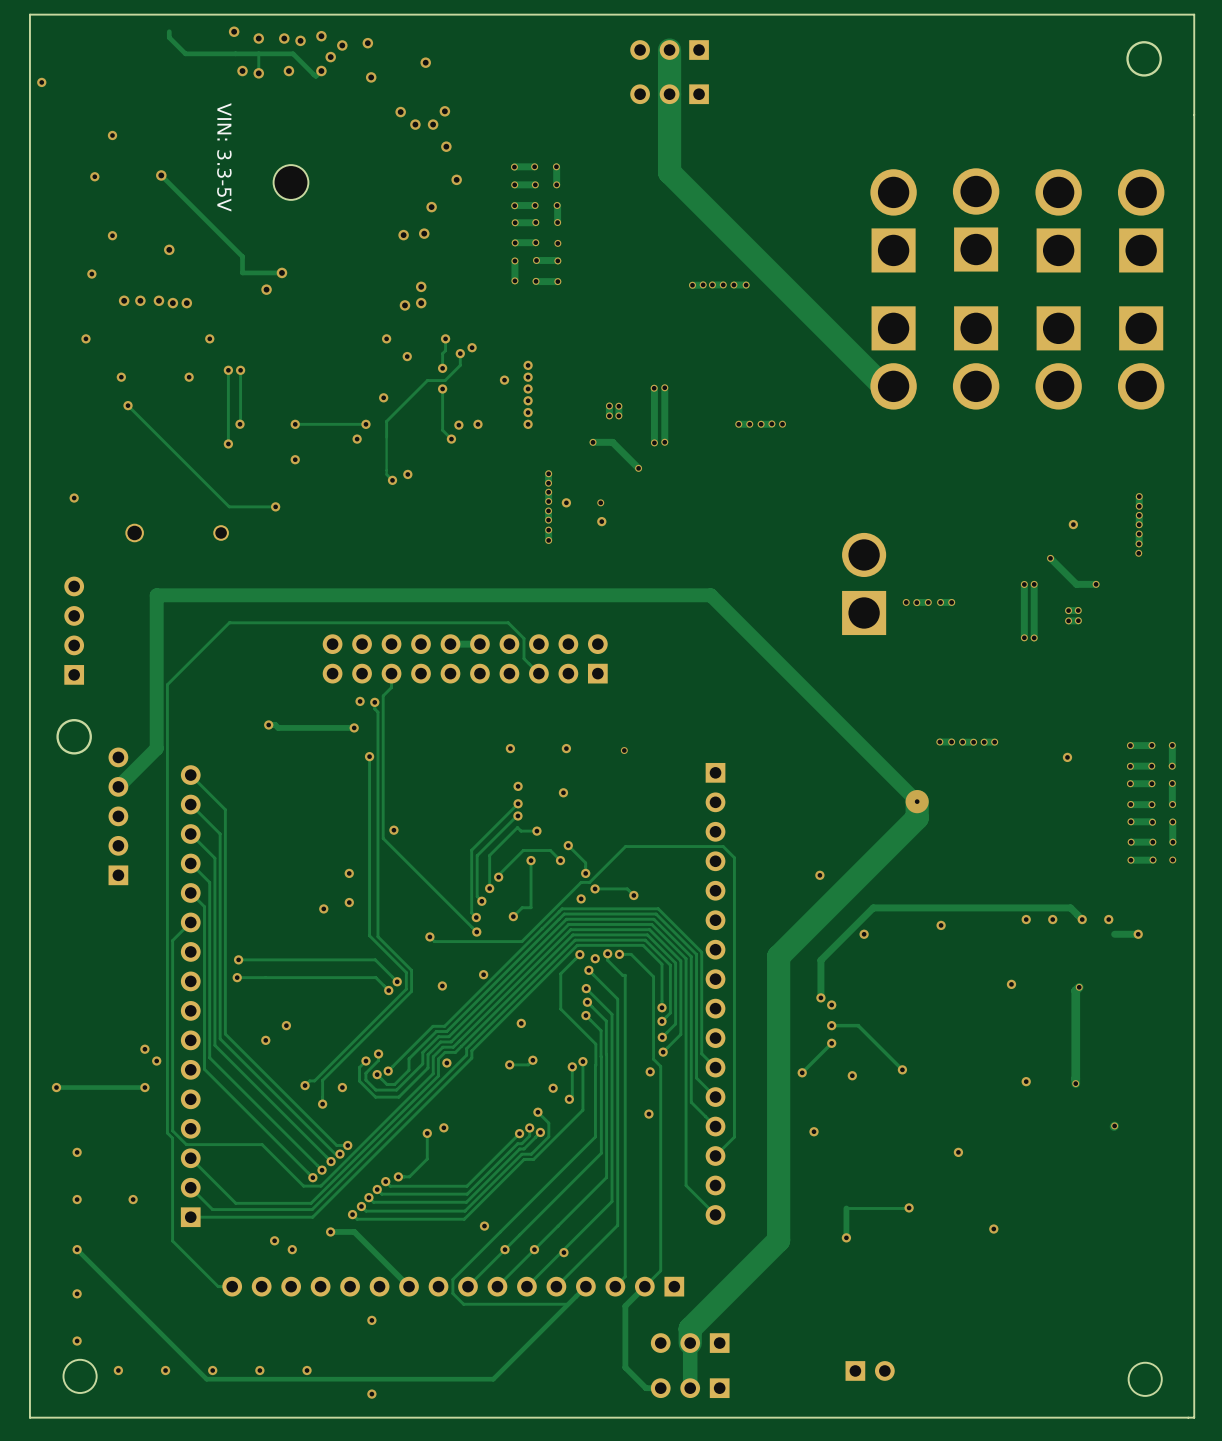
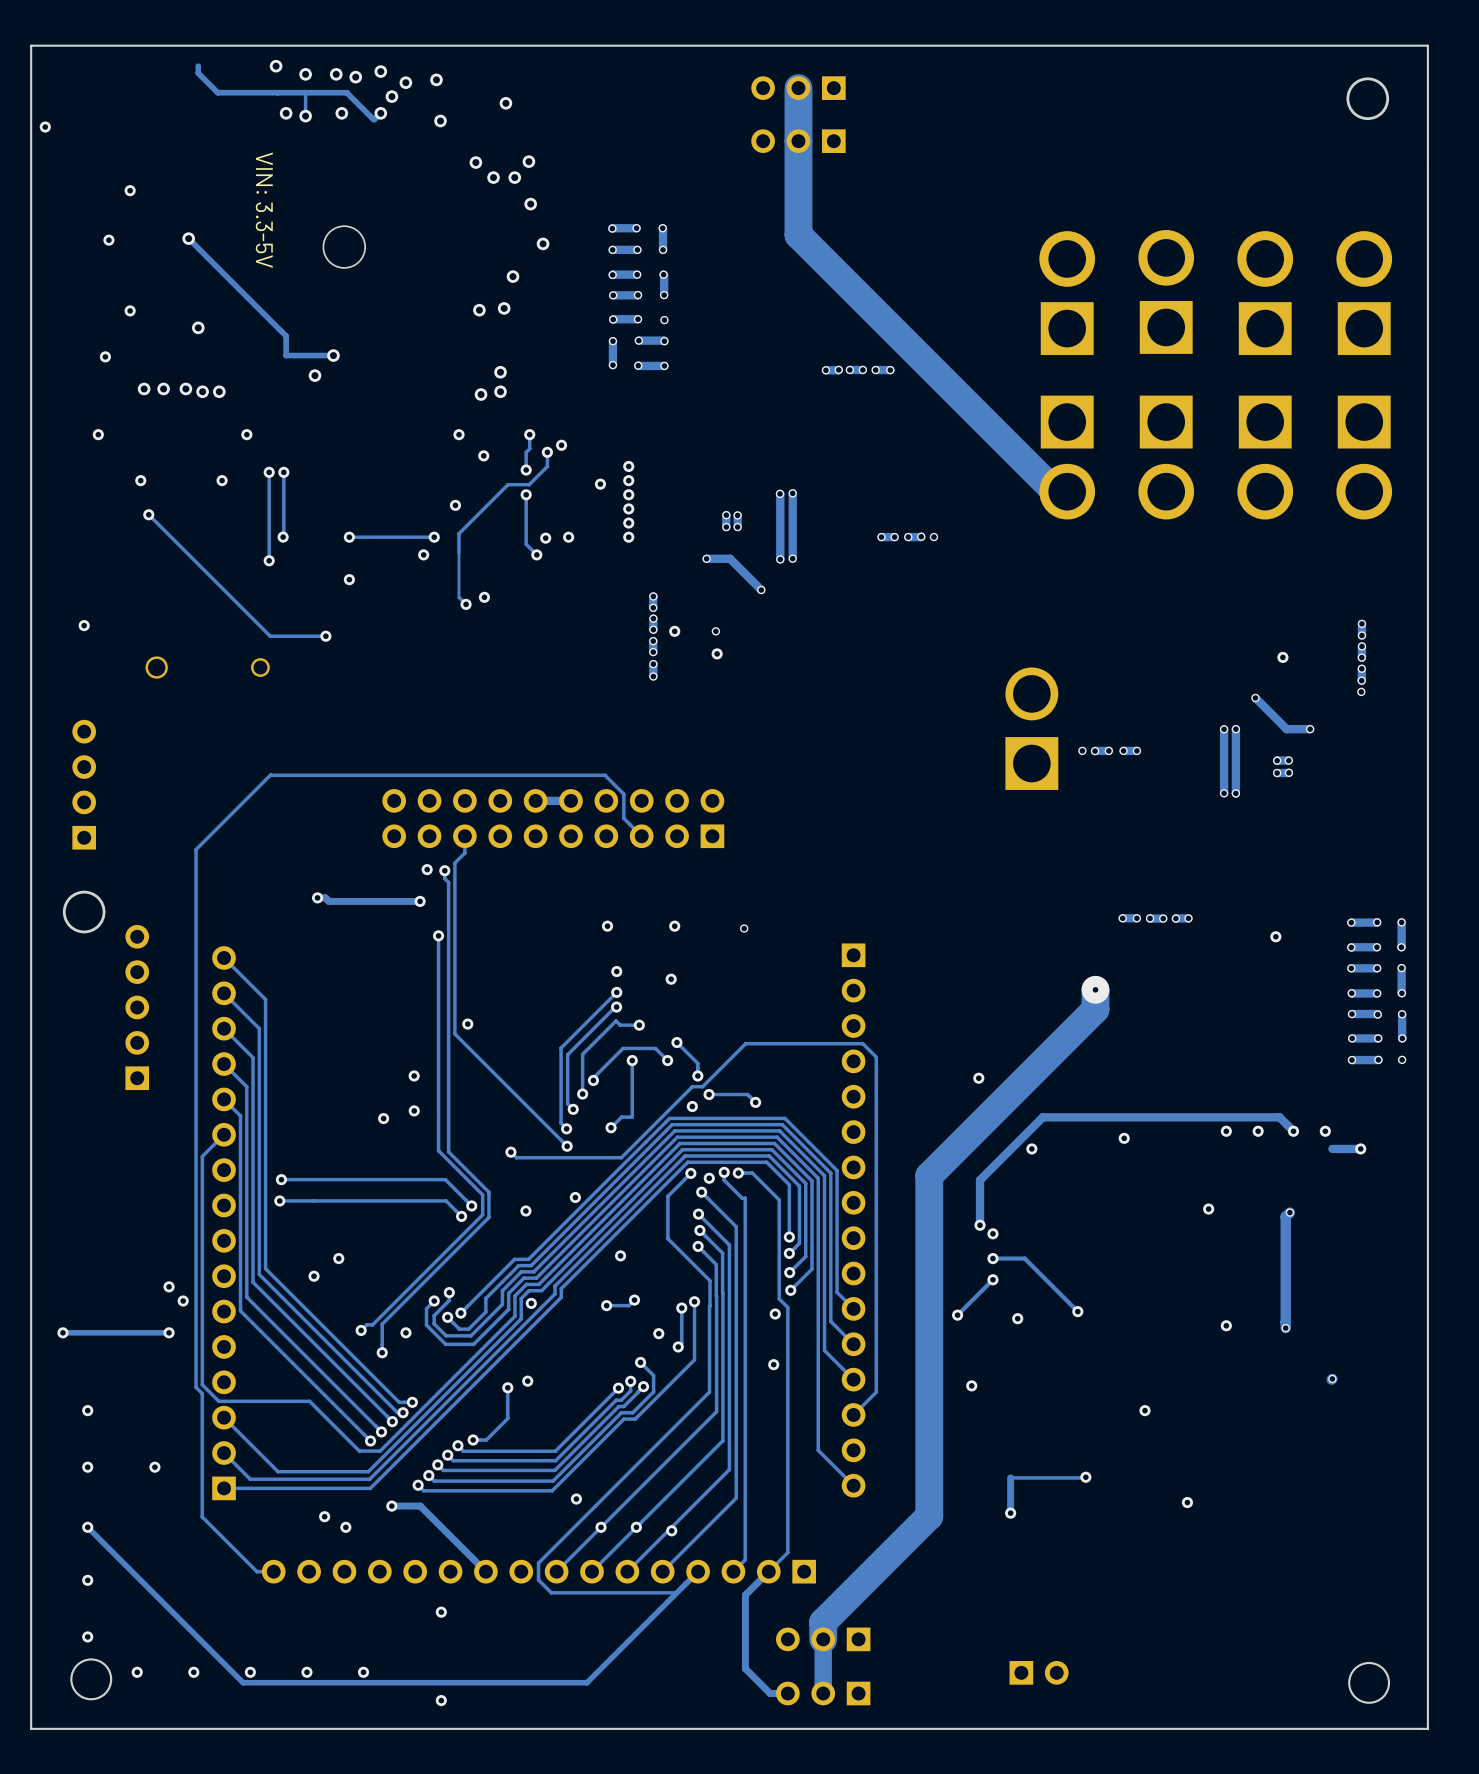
track: (118, 786) (156, 748) (156, 595) (710, 595) (917, 801) -> none

